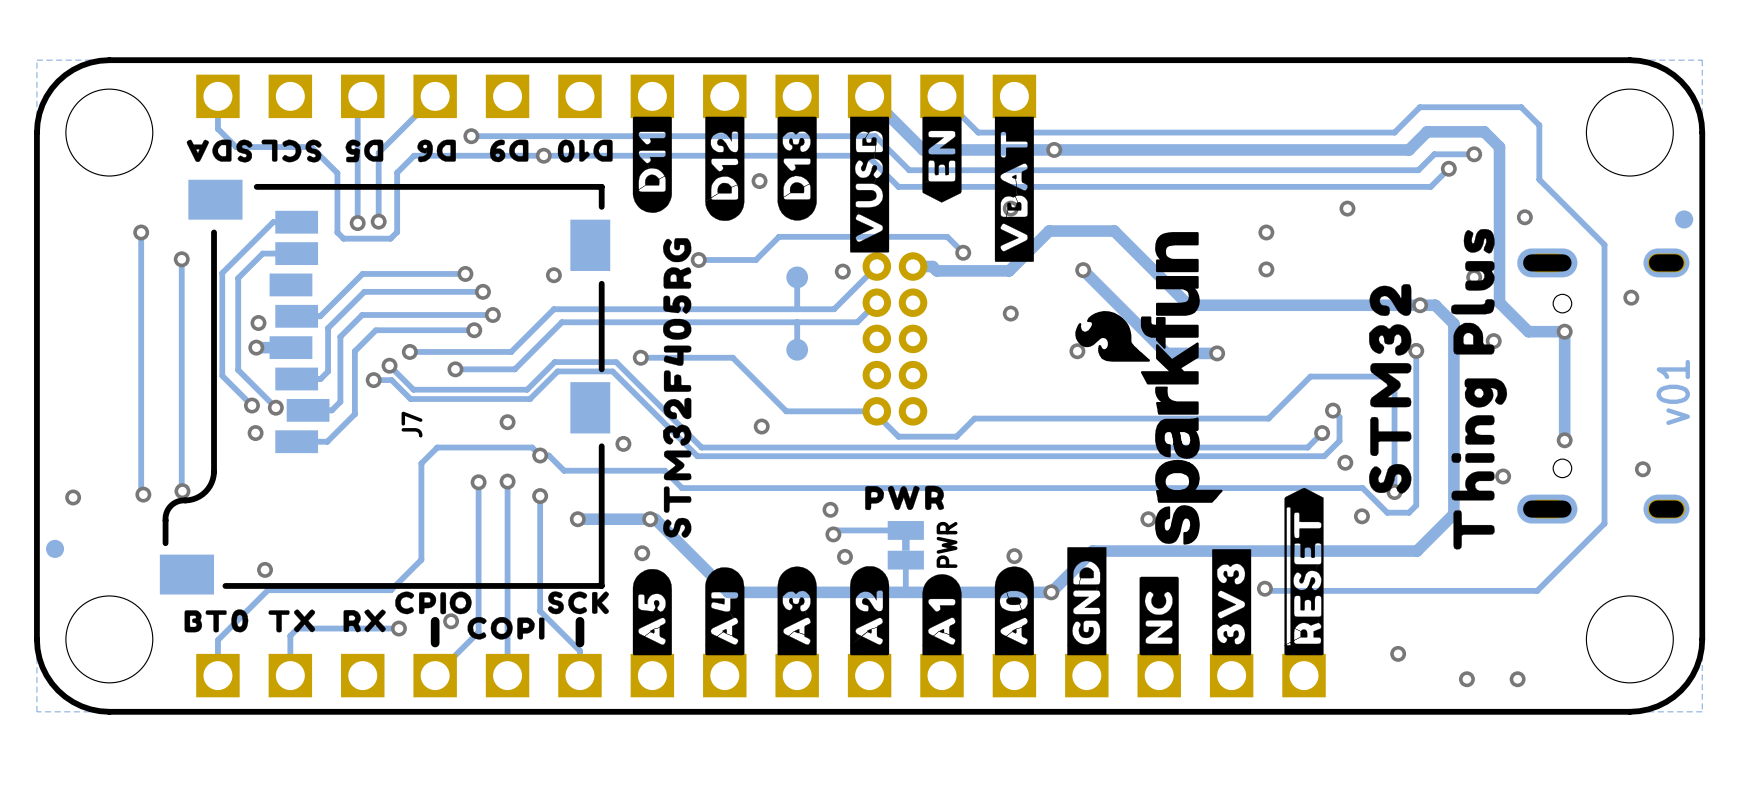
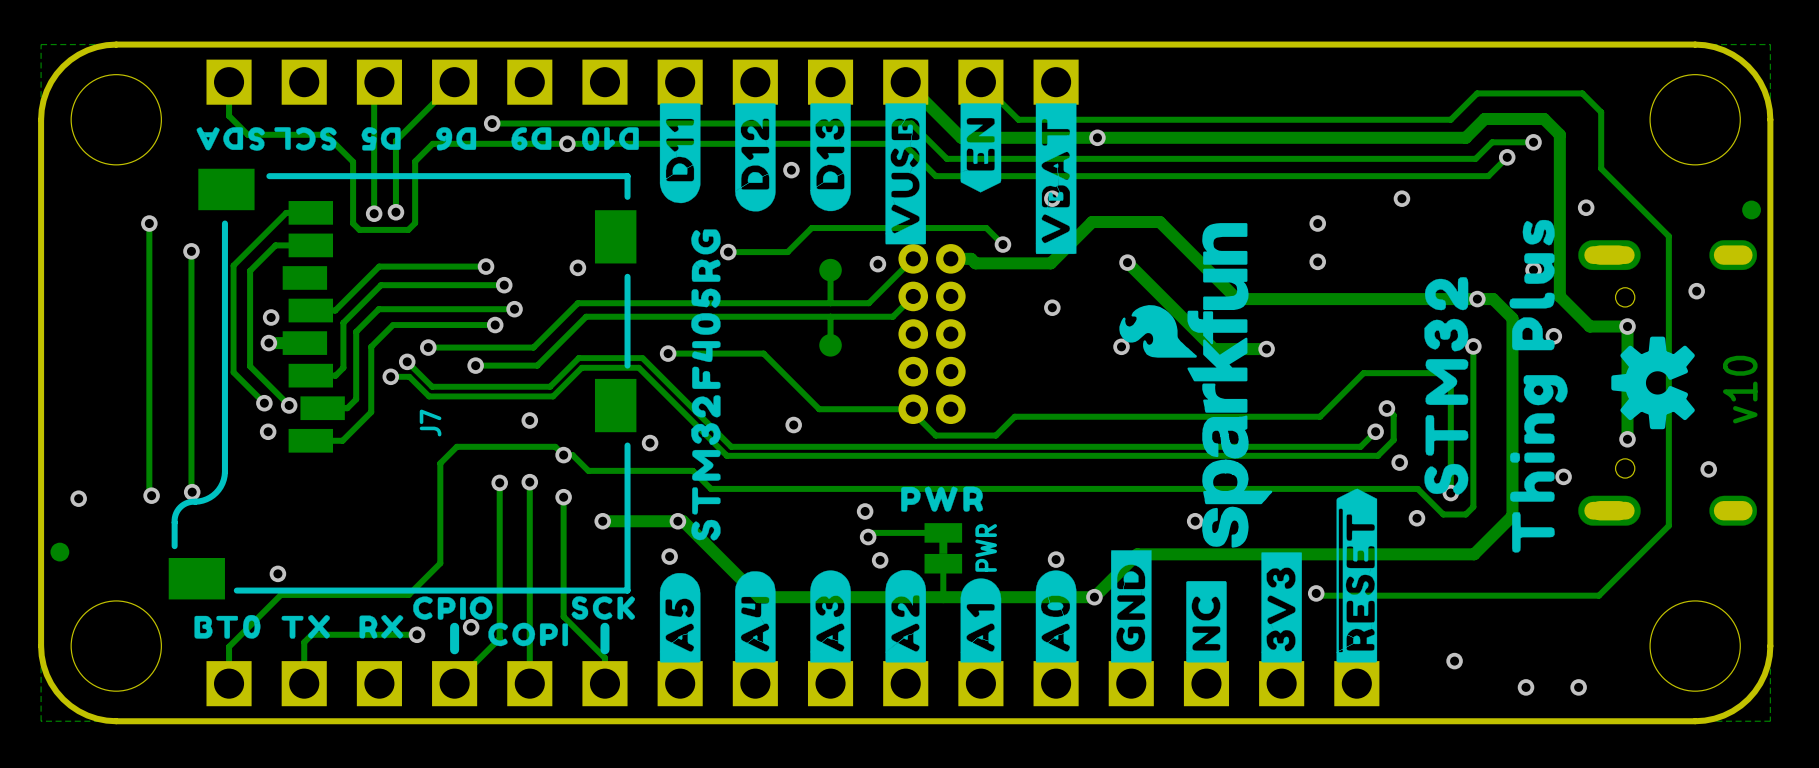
drawing: none -> [1611, 336, 1695, 430]
text: v01 (1673, 392) -> v10 (1740, 389)

